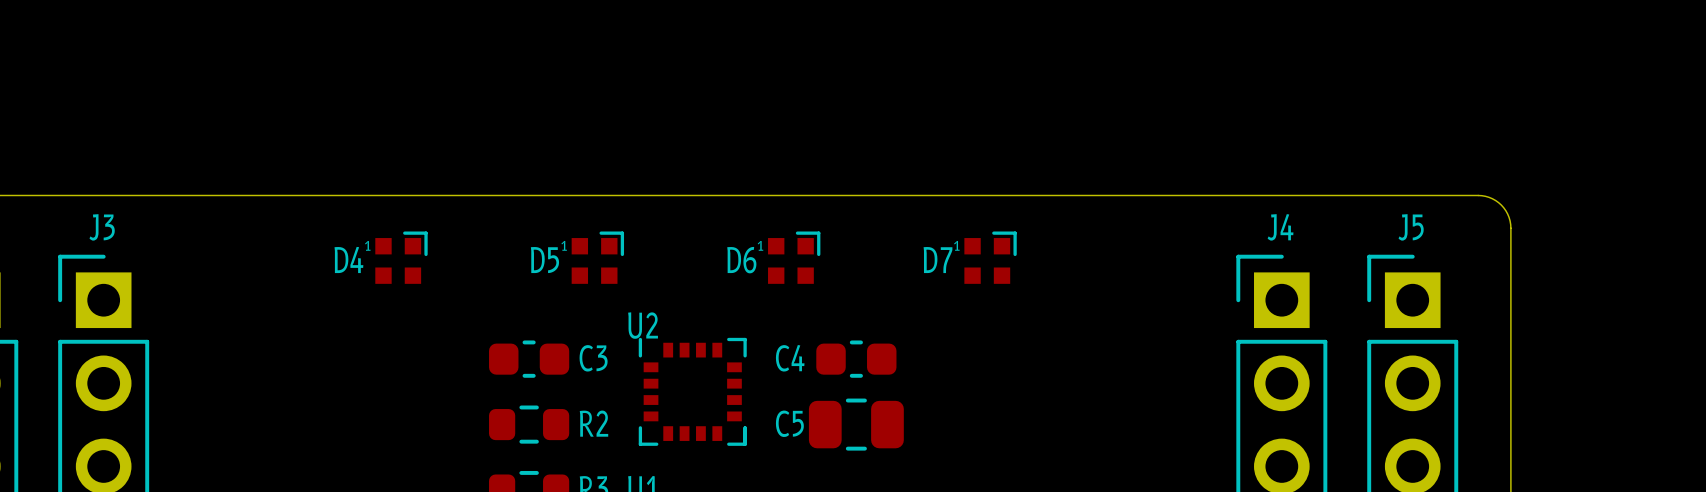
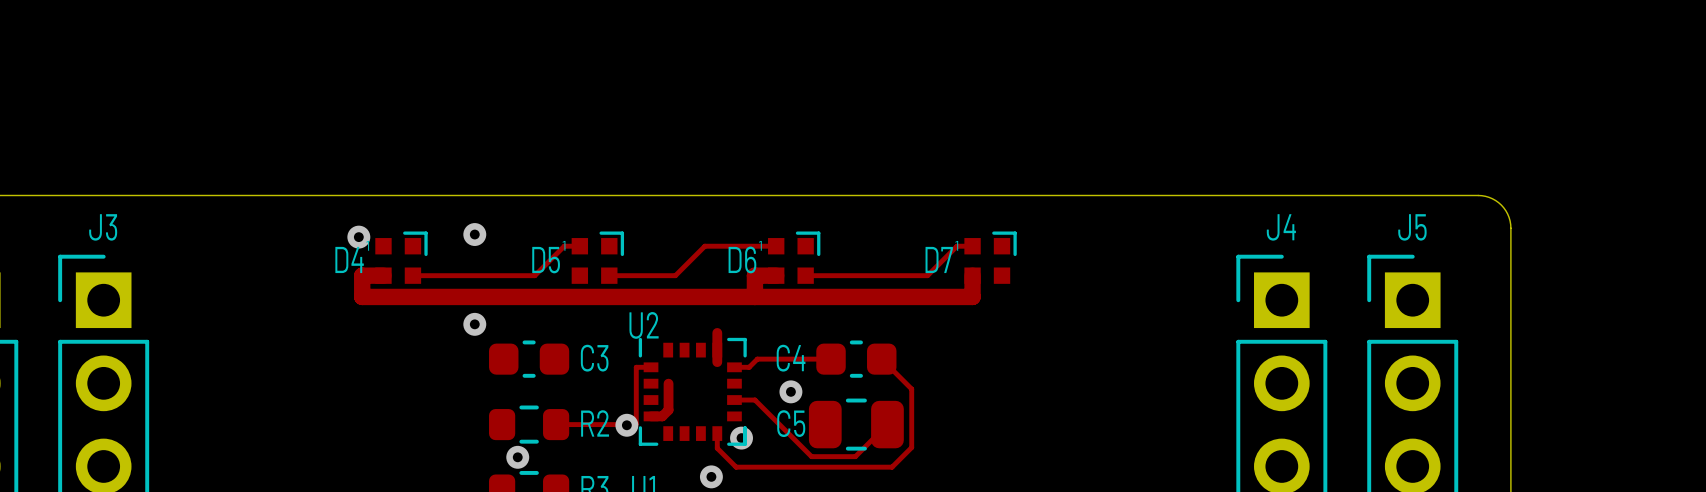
via: none -> (474, 234)
via: none -> (358, 237)
track: none -> (579, 246) (564, 246) (534, 275) (412, 275)
track: none -> (776, 246) (704, 246) (675, 275) (609, 275)
track: none -> (972, 246) (957, 246) (927, 275) (805, 275)
track: none -> (383, 275) (362, 275) (362, 296) (972, 296) (972, 275)
track: none -> (776, 275) (754, 275) (754, 296)
via: none -> (474, 324)
track: none -> (717, 332) (717, 362)
track: none -> (831, 359) (757, 359) (749, 367) (734, 367)
track: none -> (881, 359) (911, 389) (911, 447) (892, 467) (736, 467) (717, 448) (717, 433)
track: none -> (651, 367) (636, 367) (635, 424) (556, 424)
track: none -> (668, 383) (668, 410) (662, 416) (651, 416)
via: none -> (790, 391)
track: none -> (734, 400) (754, 400) (811, 456) (855, 456) (887, 424)
via: none -> (626, 425)
via: none -> (741, 438)
via: none -> (517, 457)
via: none -> (711, 476)

